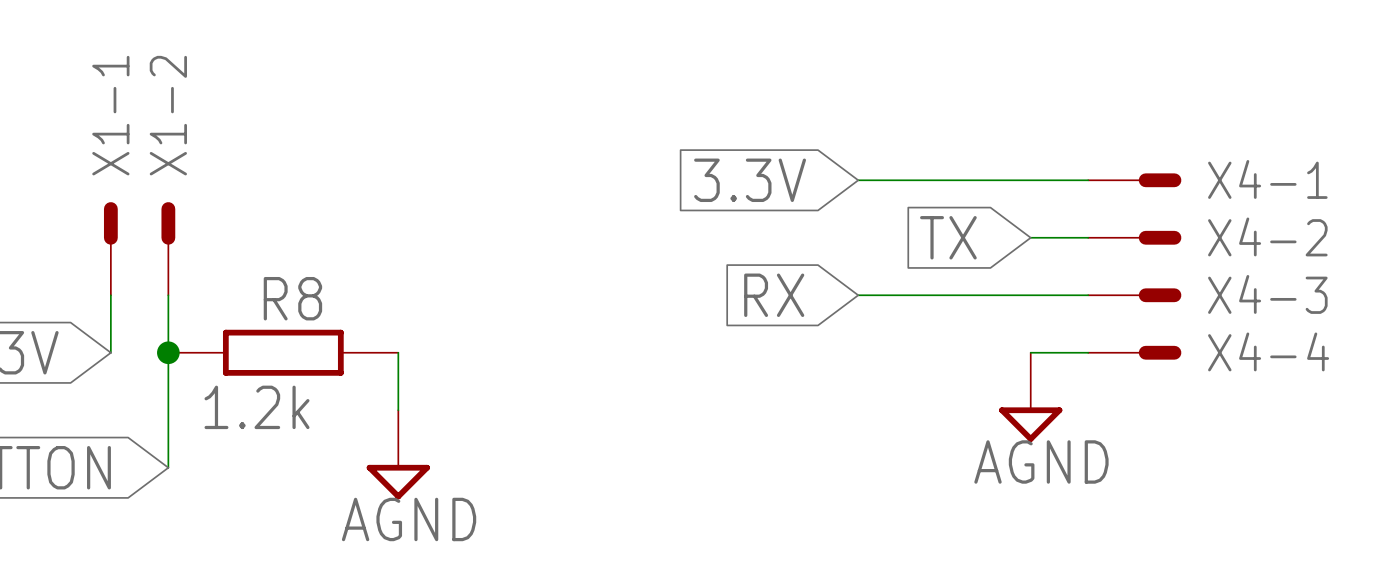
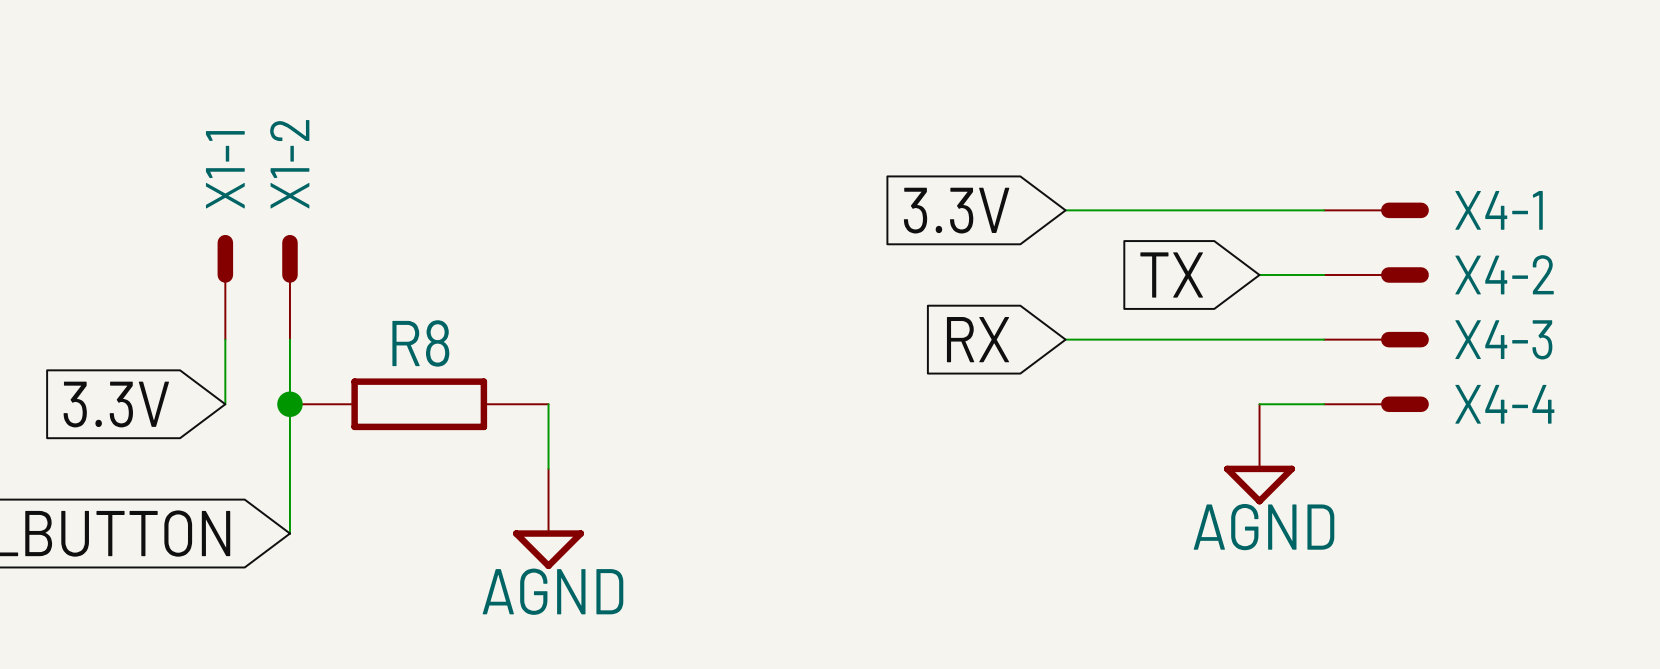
R8 value: 1.2k (257, 407) -> none

